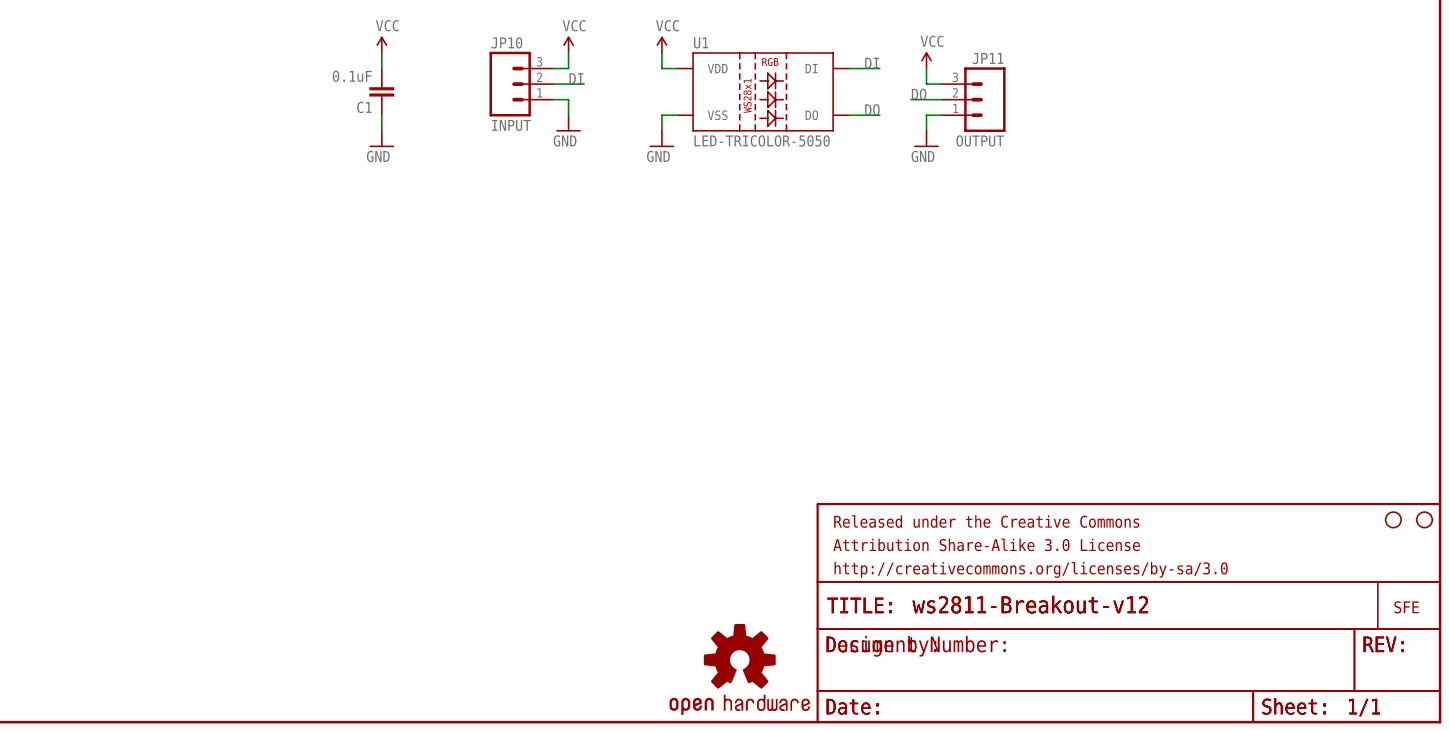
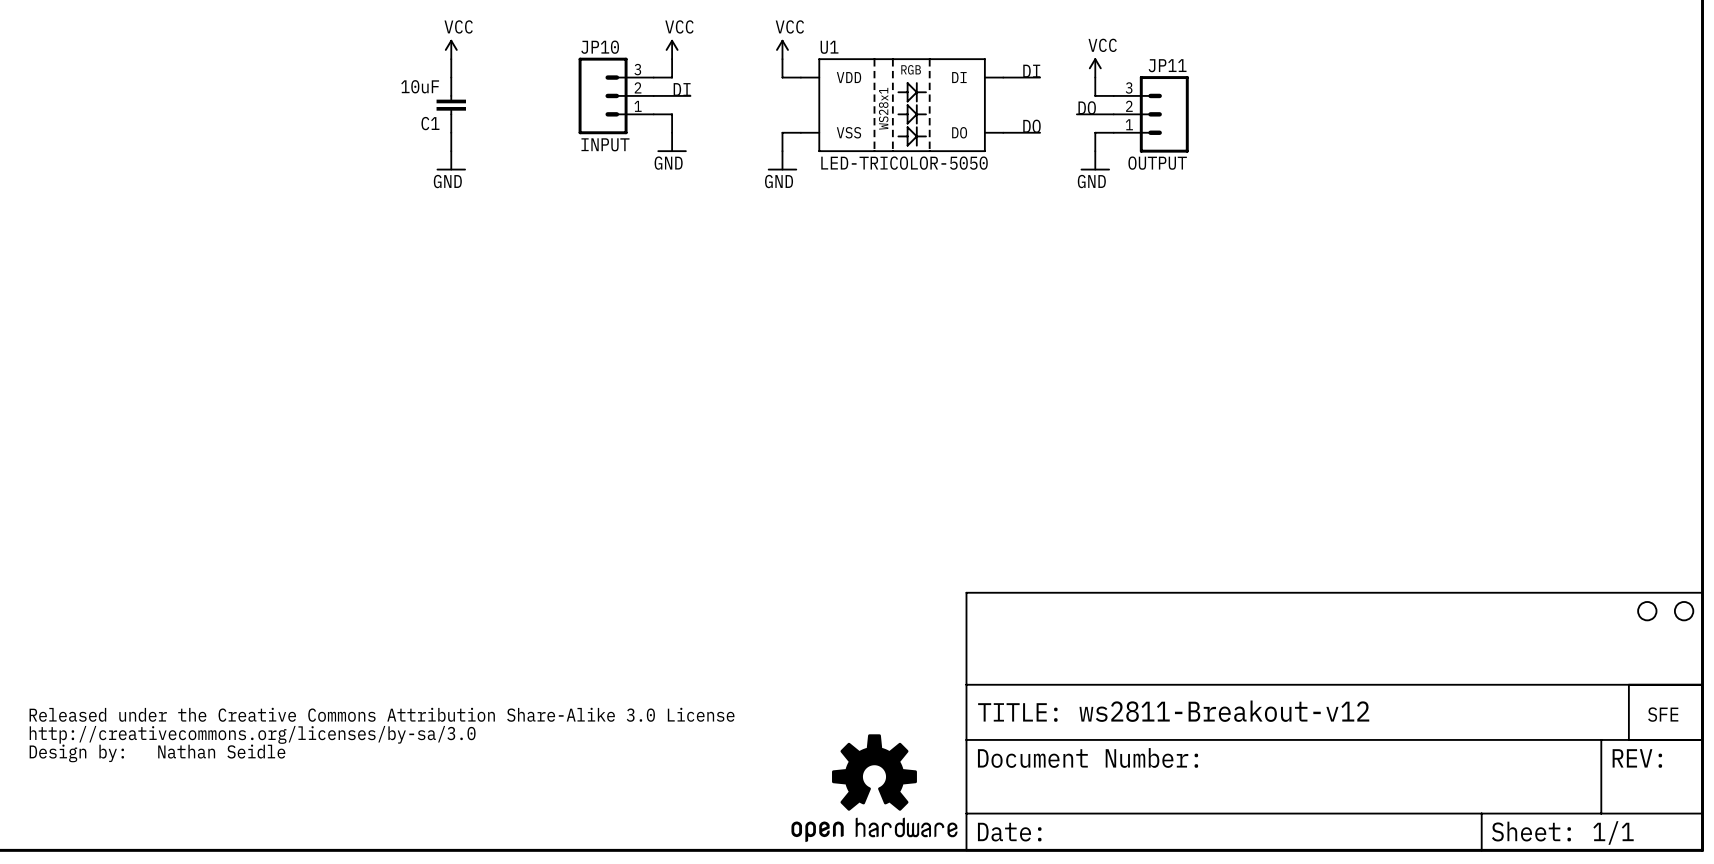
C1 value: 0.1uF (352, 76) -> 10uF (420, 86)
part: (1128, 613) -> none
part: none -> (382, 735)
text: none -> Nathan Seidle (221, 751)

